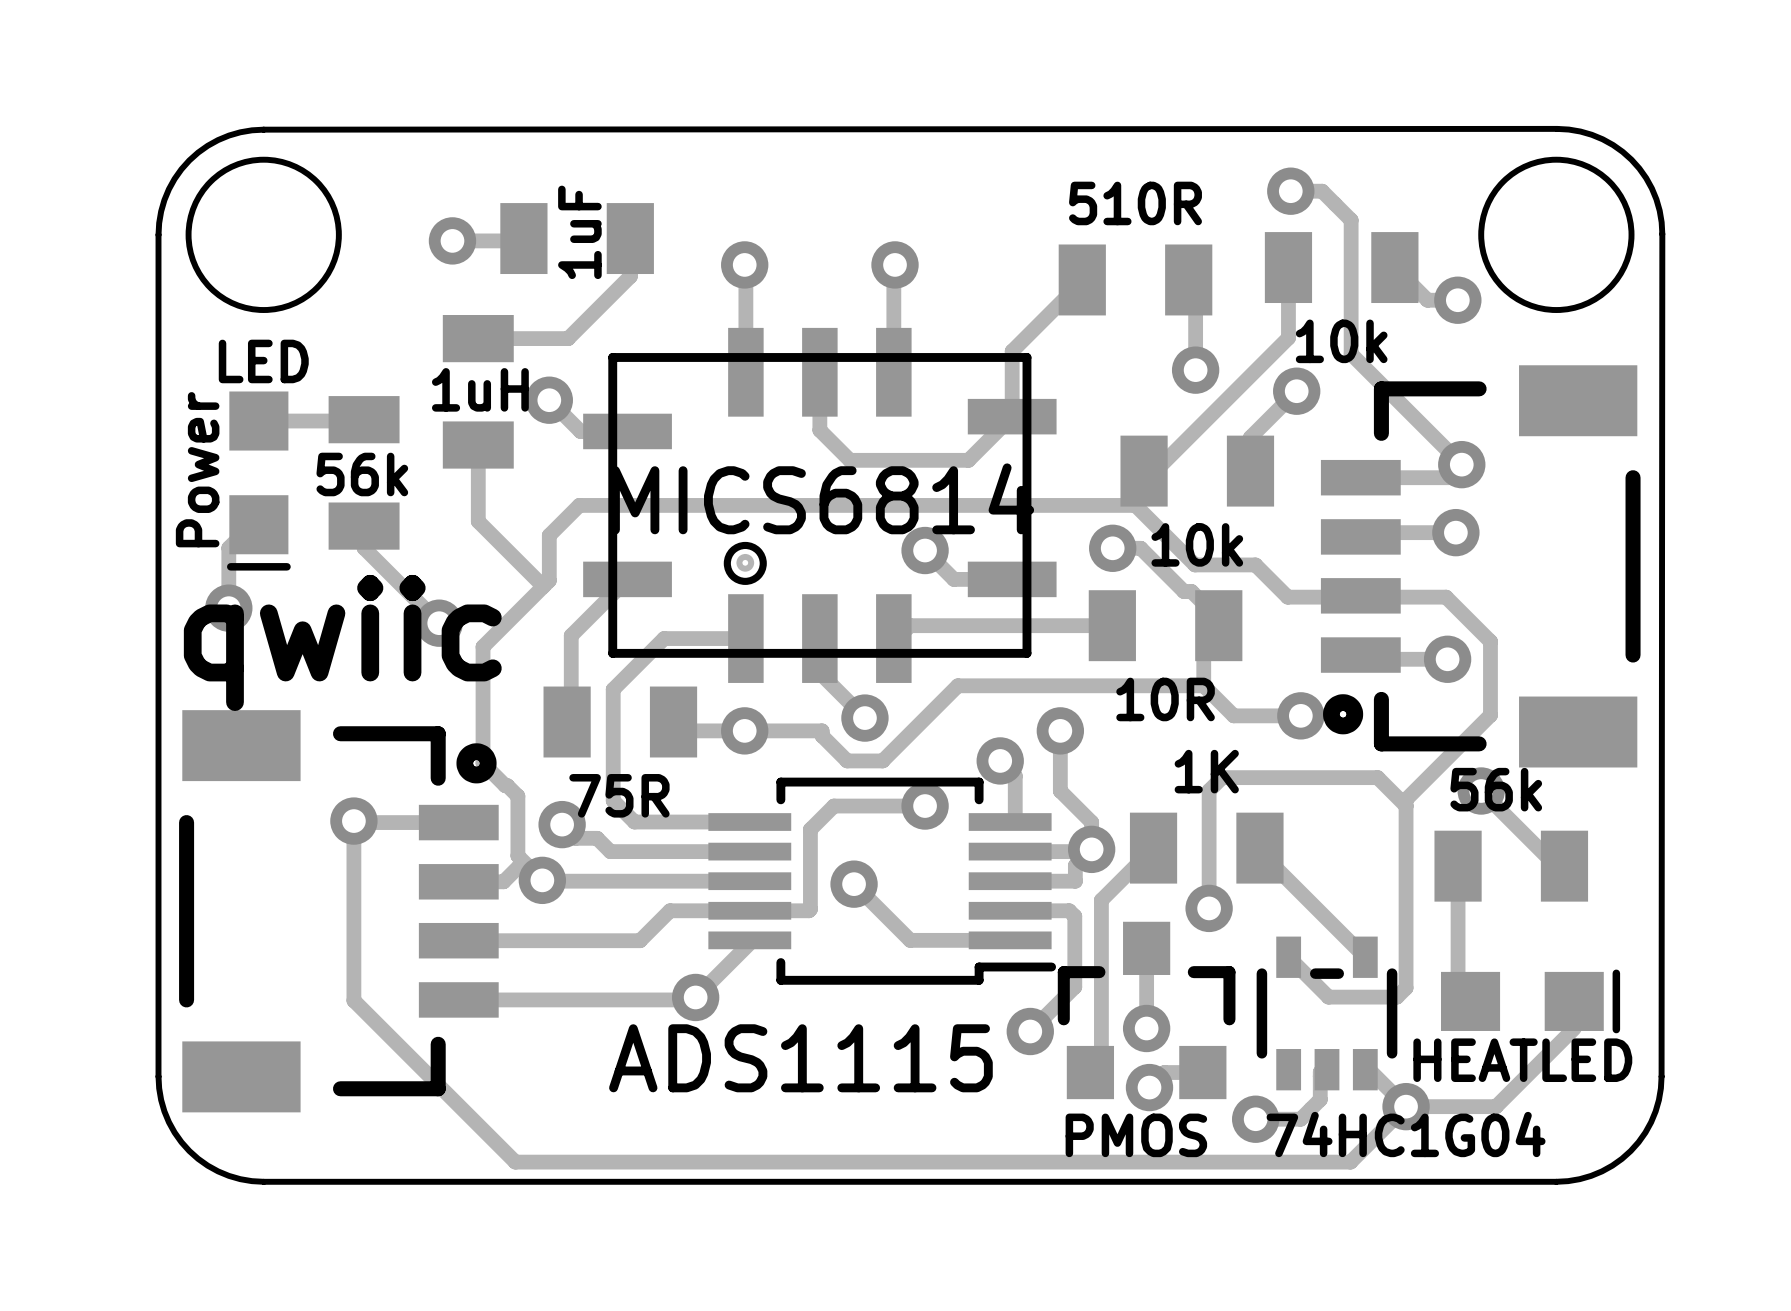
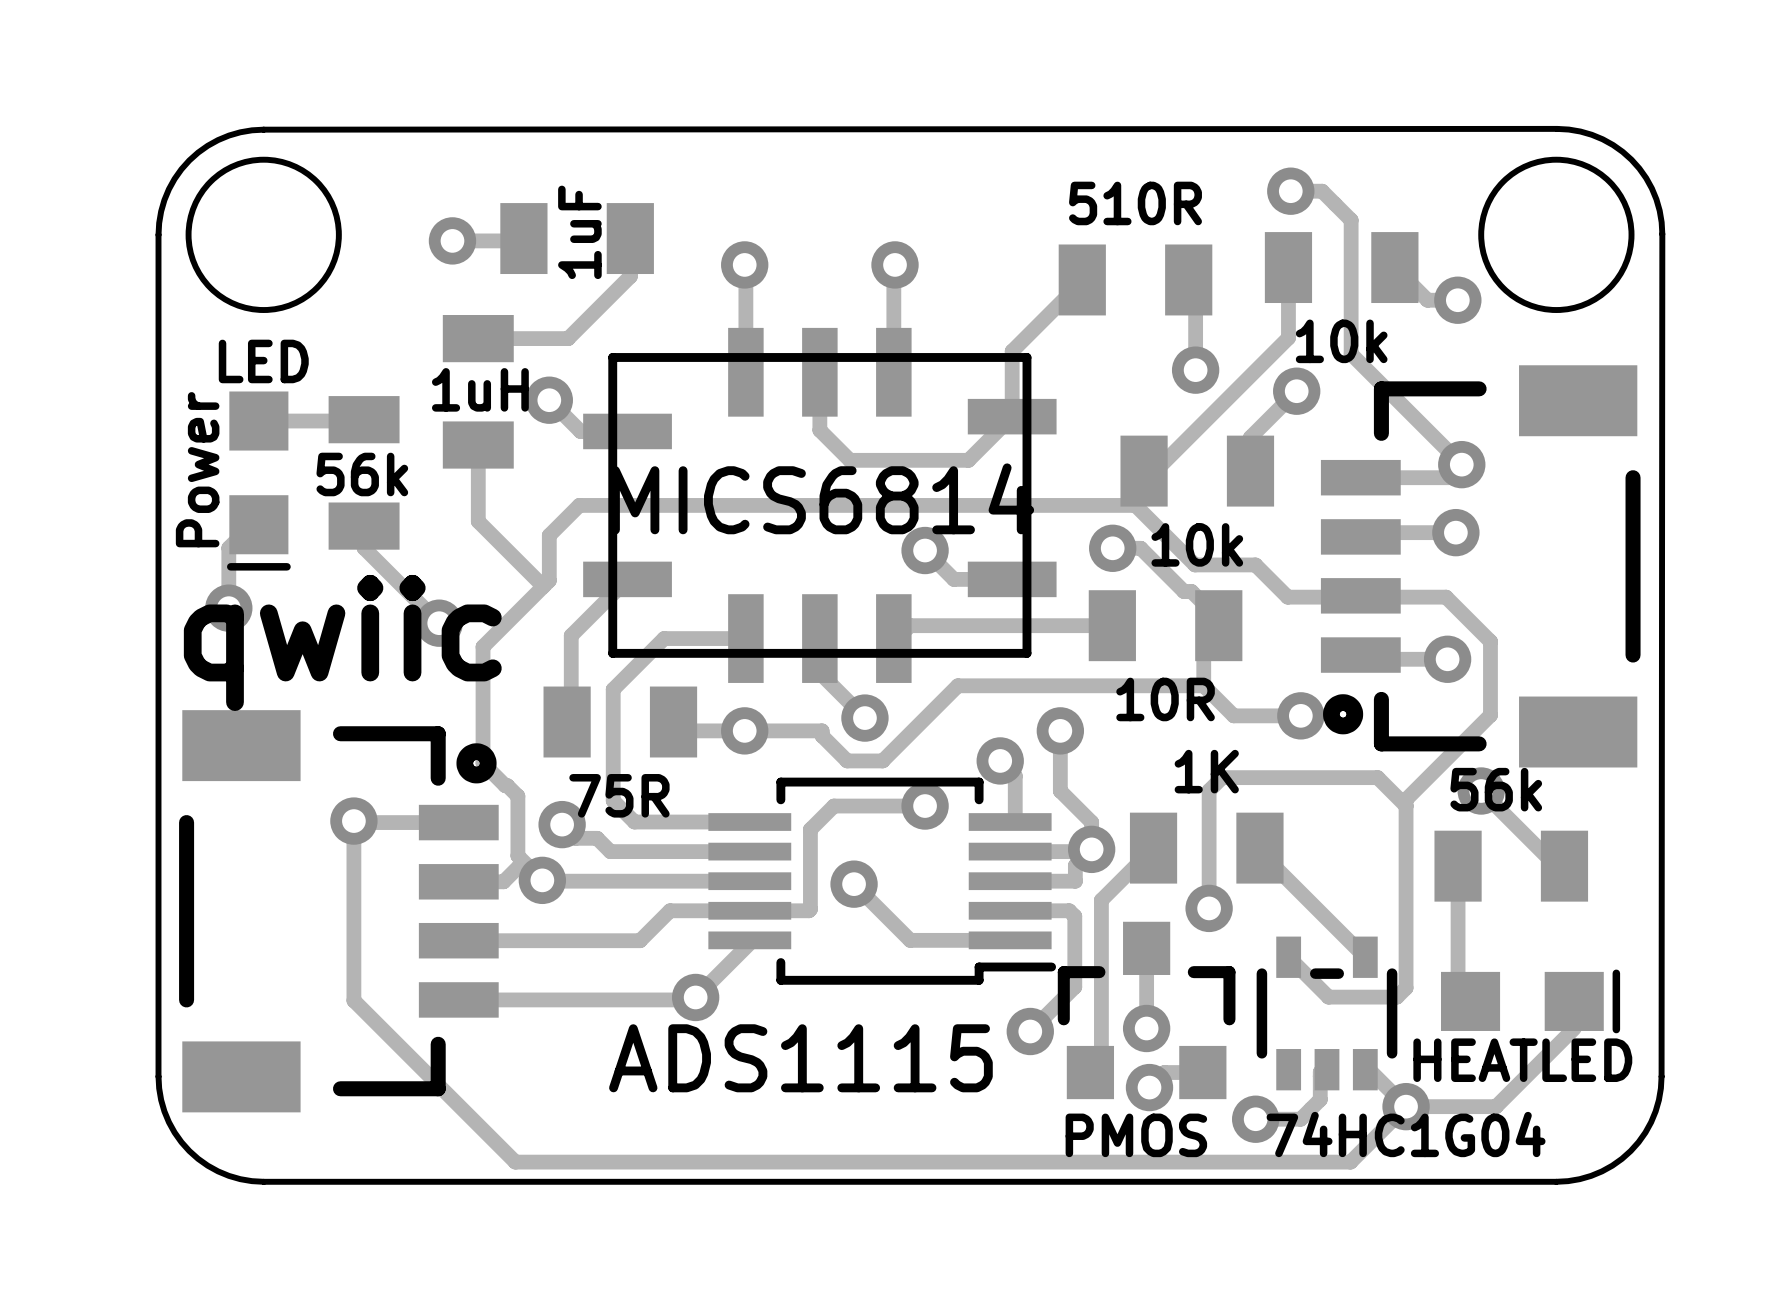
MICS6814 footprint: [583, 327, 1057, 683] -> [583, 327, 1057, 683]

